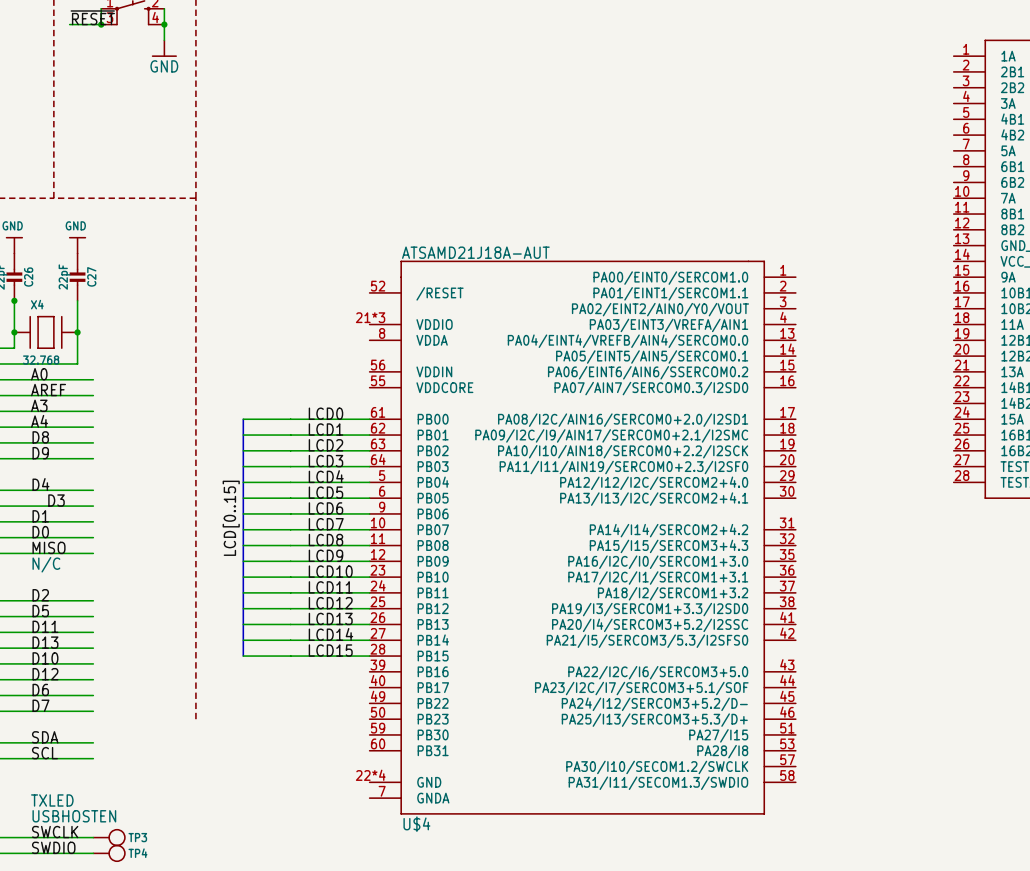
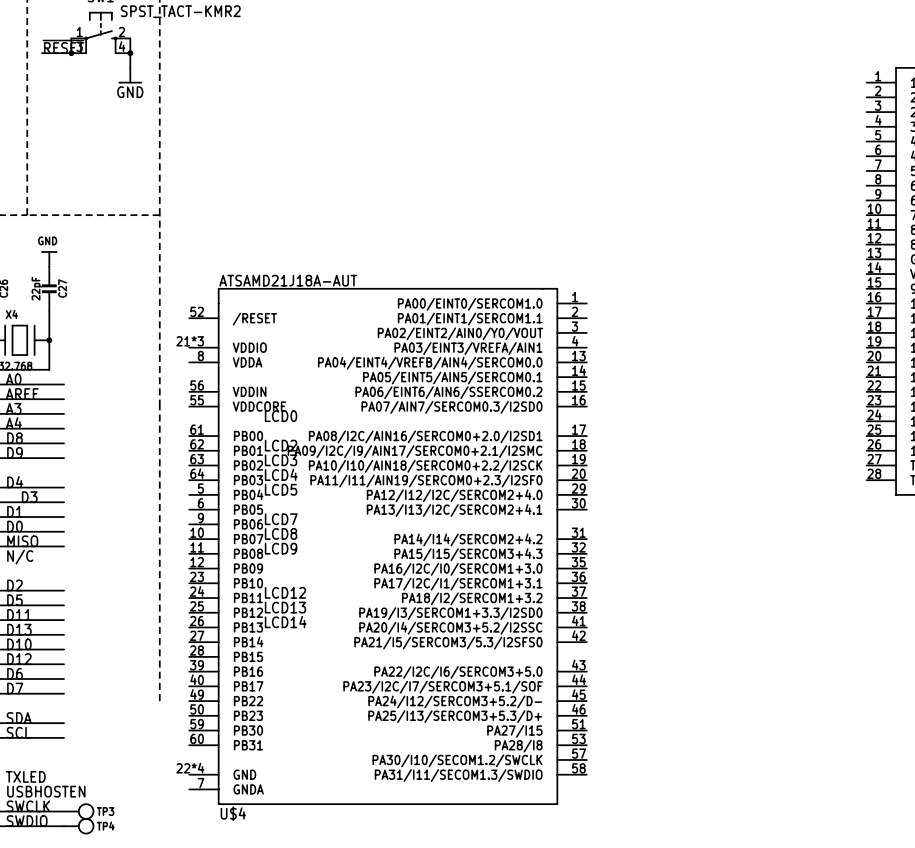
bus: (243, 419) (243, 656) -> none
wire: (243, 419) (369, 419) -> none
label: LCD1 (325, 429) -> none
wire: (243, 435) (369, 435) -> none
wire: (243, 450) (369, 450) -> none
wire: (243, 466) (369, 466) -> none
wire: (243, 482) (369, 482) -> none
wire: (243, 498) (369, 498) -> none
label: LCD6 (325, 508) -> none
wire: (243, 513) (369, 513) -> none
label: LCD[0..15] (231, 518) -> none
wire: (243, 529) (369, 529) -> none
U$4 position: (582, 537) -> (388, 546)
wire: (243, 545) (369, 545) -> none
wire: (243, 561) (369, 561) -> none
label: LCD10 (330, 571) -> none
wire: (243, 577) (369, 577) -> none
label: LCD11 (330, 587) -> none
wire: (243, 592) (369, 592) -> none
wire: (243, 608) (369, 608) -> none
wire: (243, 624) (369, 624) -> none
wire: (243, 640) (369, 640) -> none
label: LCD15 (330, 650) -> none
wire: (243, 656) (369, 656) -> none

